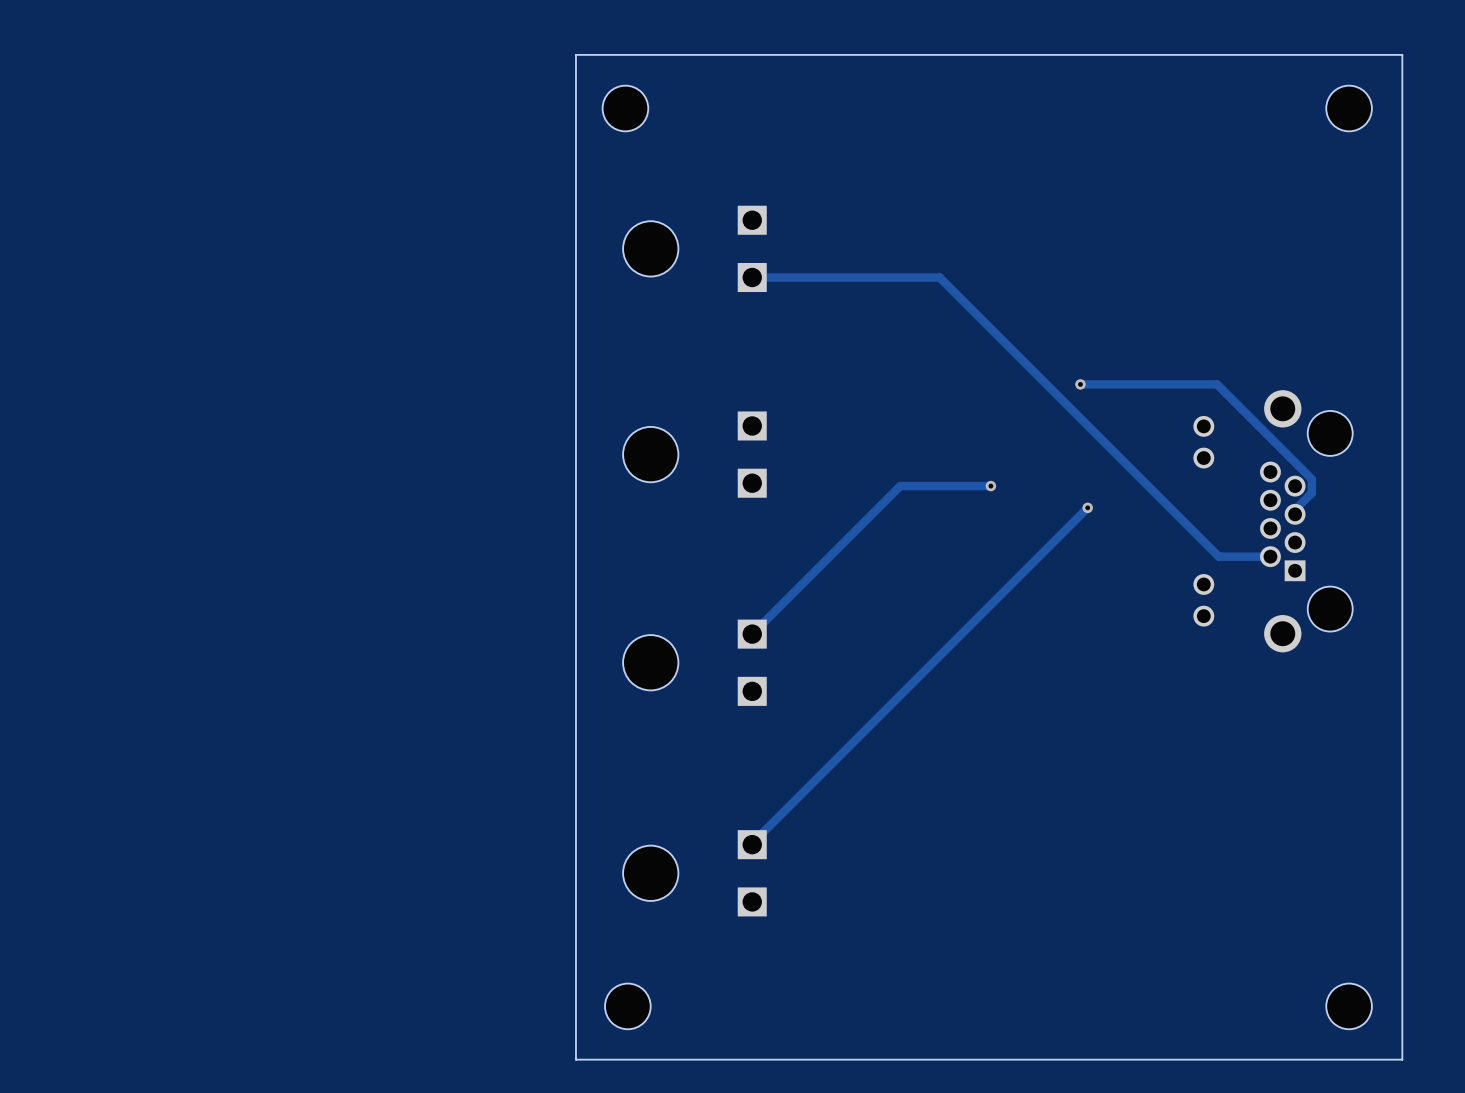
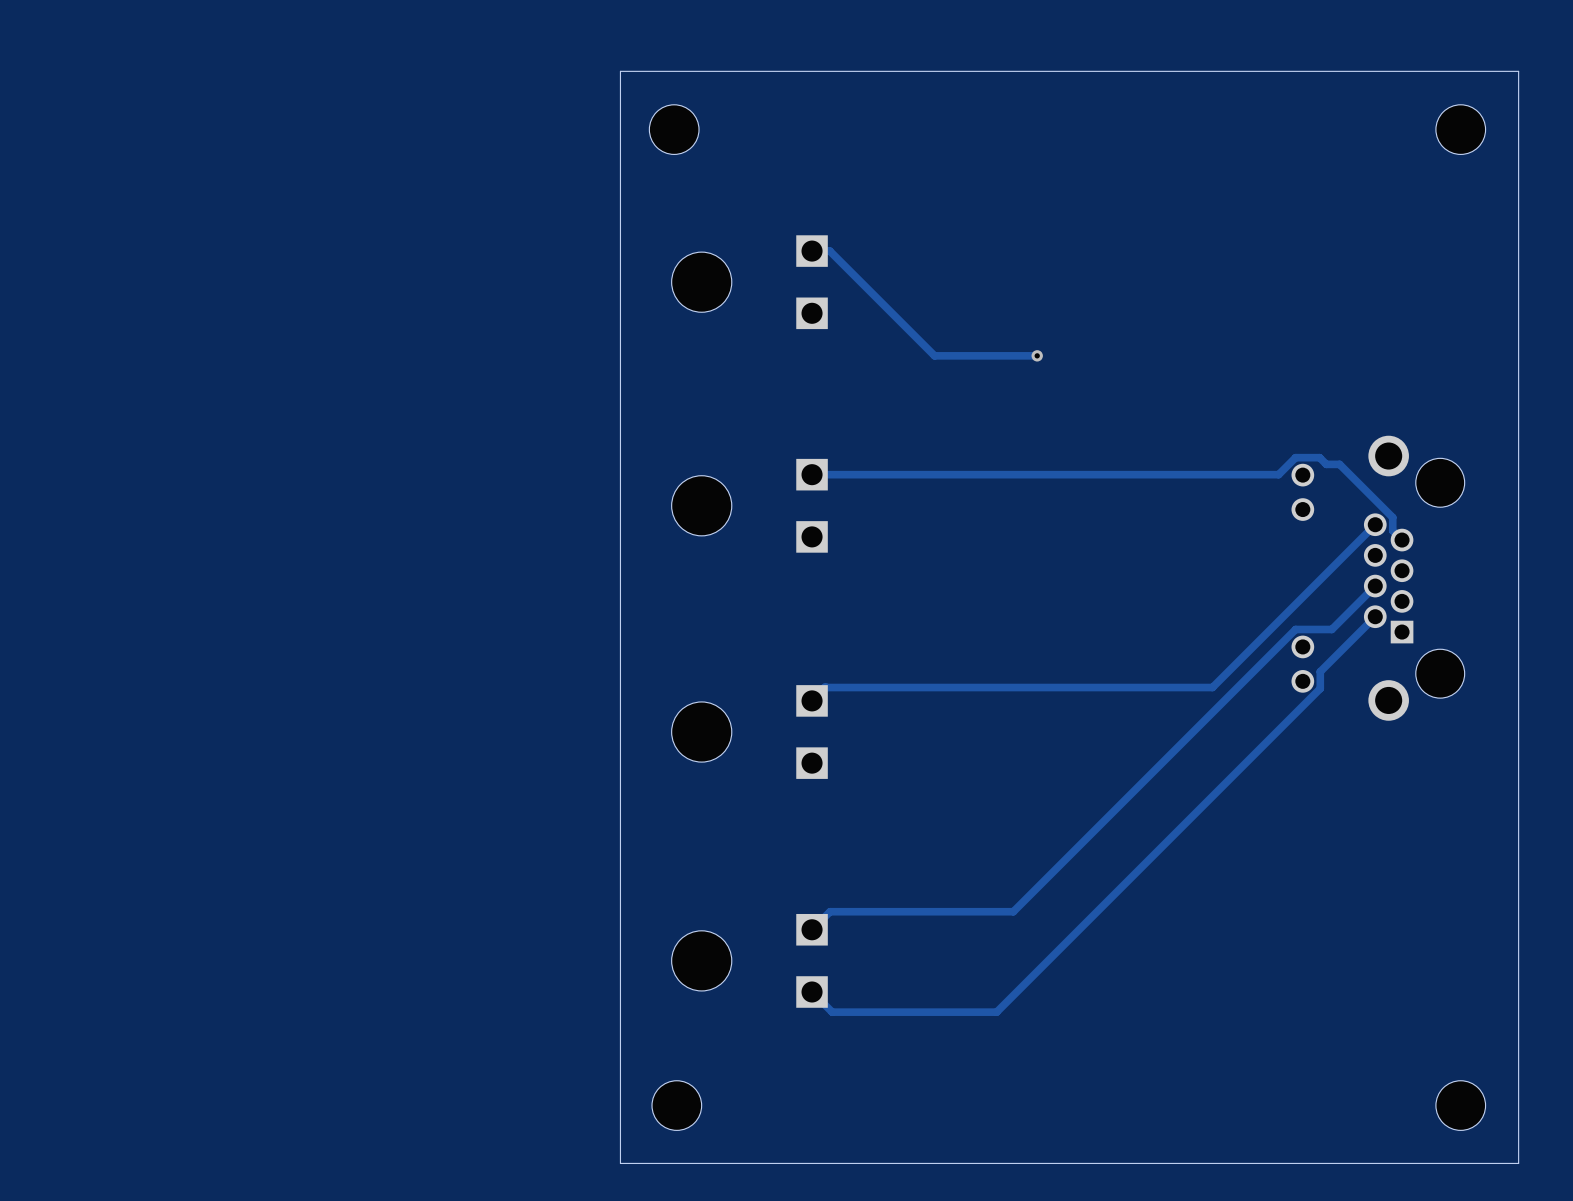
track: none -> (812, 251) (829, 251) (934, 355) (1037, 355)
track: (752, 277) (939, 277) (1218, 556) (1270, 556) -> (812, 992) (832, 1012) (996, 1012) (1320, 688) (1320, 671) (1375, 616)
via: none -> (1037, 355)
track: (1080, 384) (1217, 384) (1311, 479) (1311, 493) (1295, 509) (1295, 514) -> none
via: (1080, 384) -> none
track: none -> (812, 474) (1278, 474) (1295, 457) (1319, 457) (1326, 464) (1339, 464) (1392, 517) (1392, 530) (1402, 540)
track: (990, 486) (900, 486) (764, 621) -> (1375, 524) (1212, 687) (825, 687)
via: (990, 486) -> none
track: (1087, 507) (752, 844) -> (1375, 586) (1331, 629) (1295, 629) (1013, 911) (830, 911) (812, 929)
via: (1087, 507) -> none

